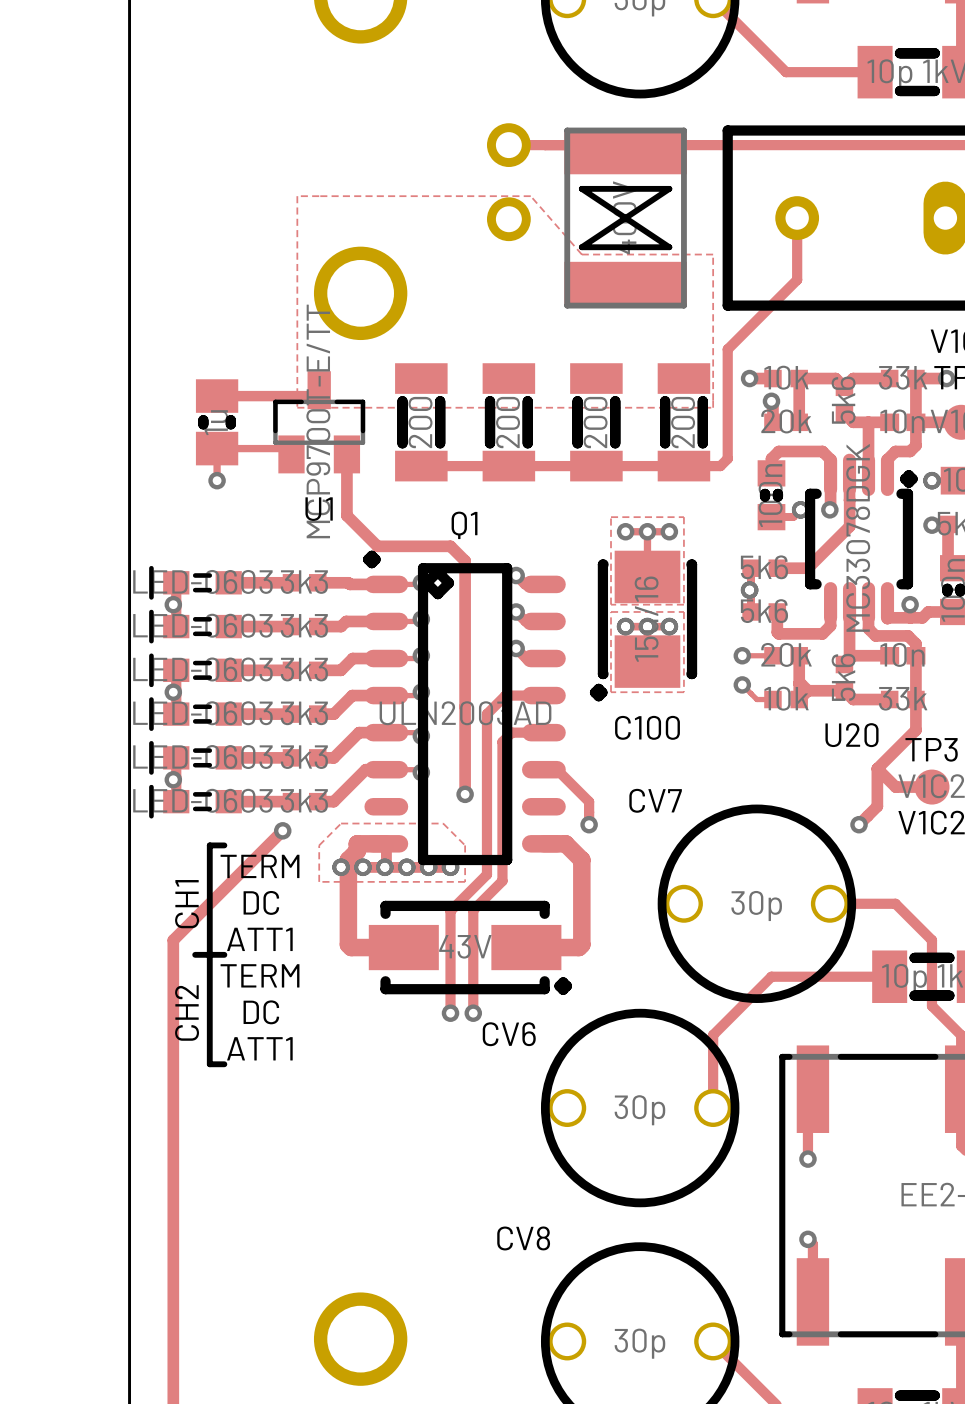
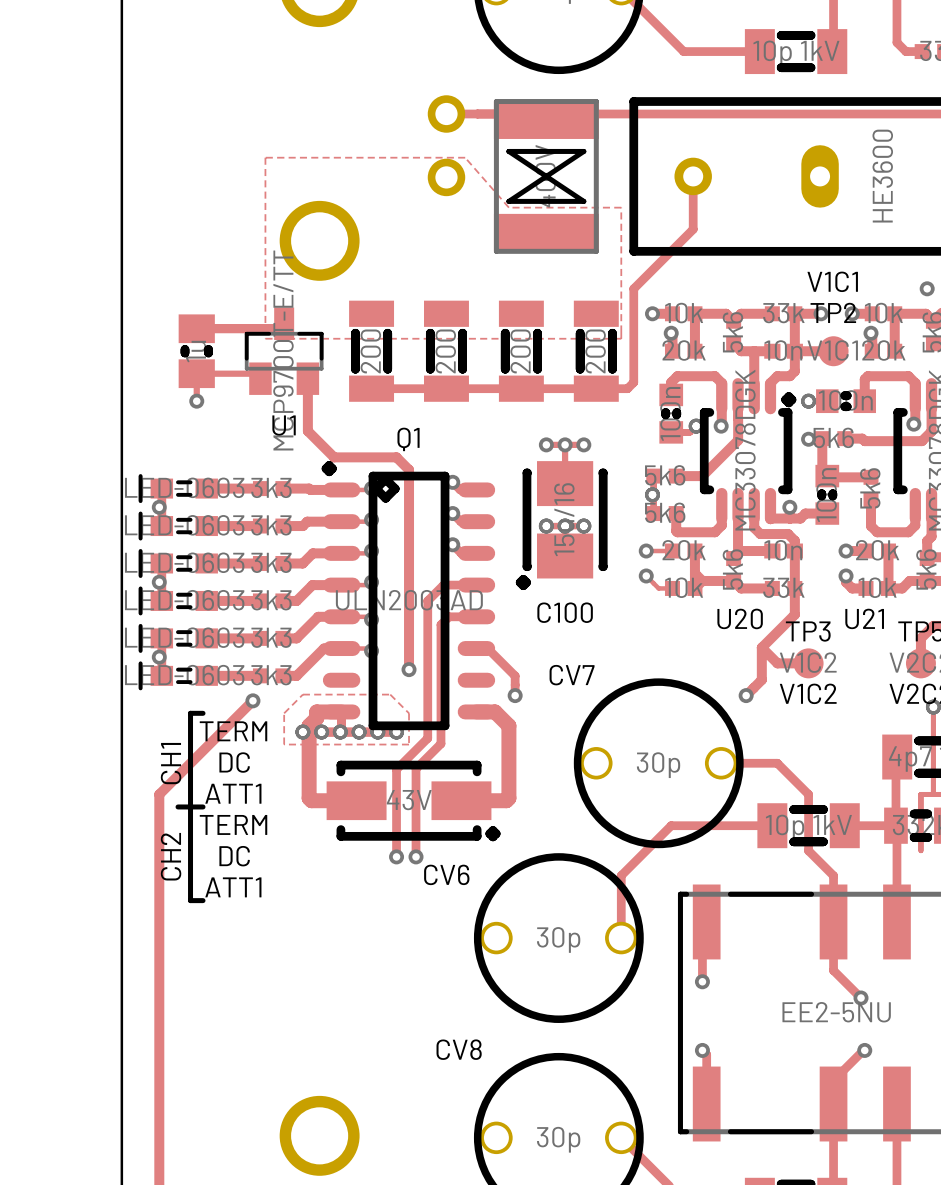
zone outline: (611, 517) (611, 604) (683, 604) (683, 517) (611, 517) -> none
zone outline: (611, 611) (683, 611) (683, 692) (611, 692) (611, 611) -> none

